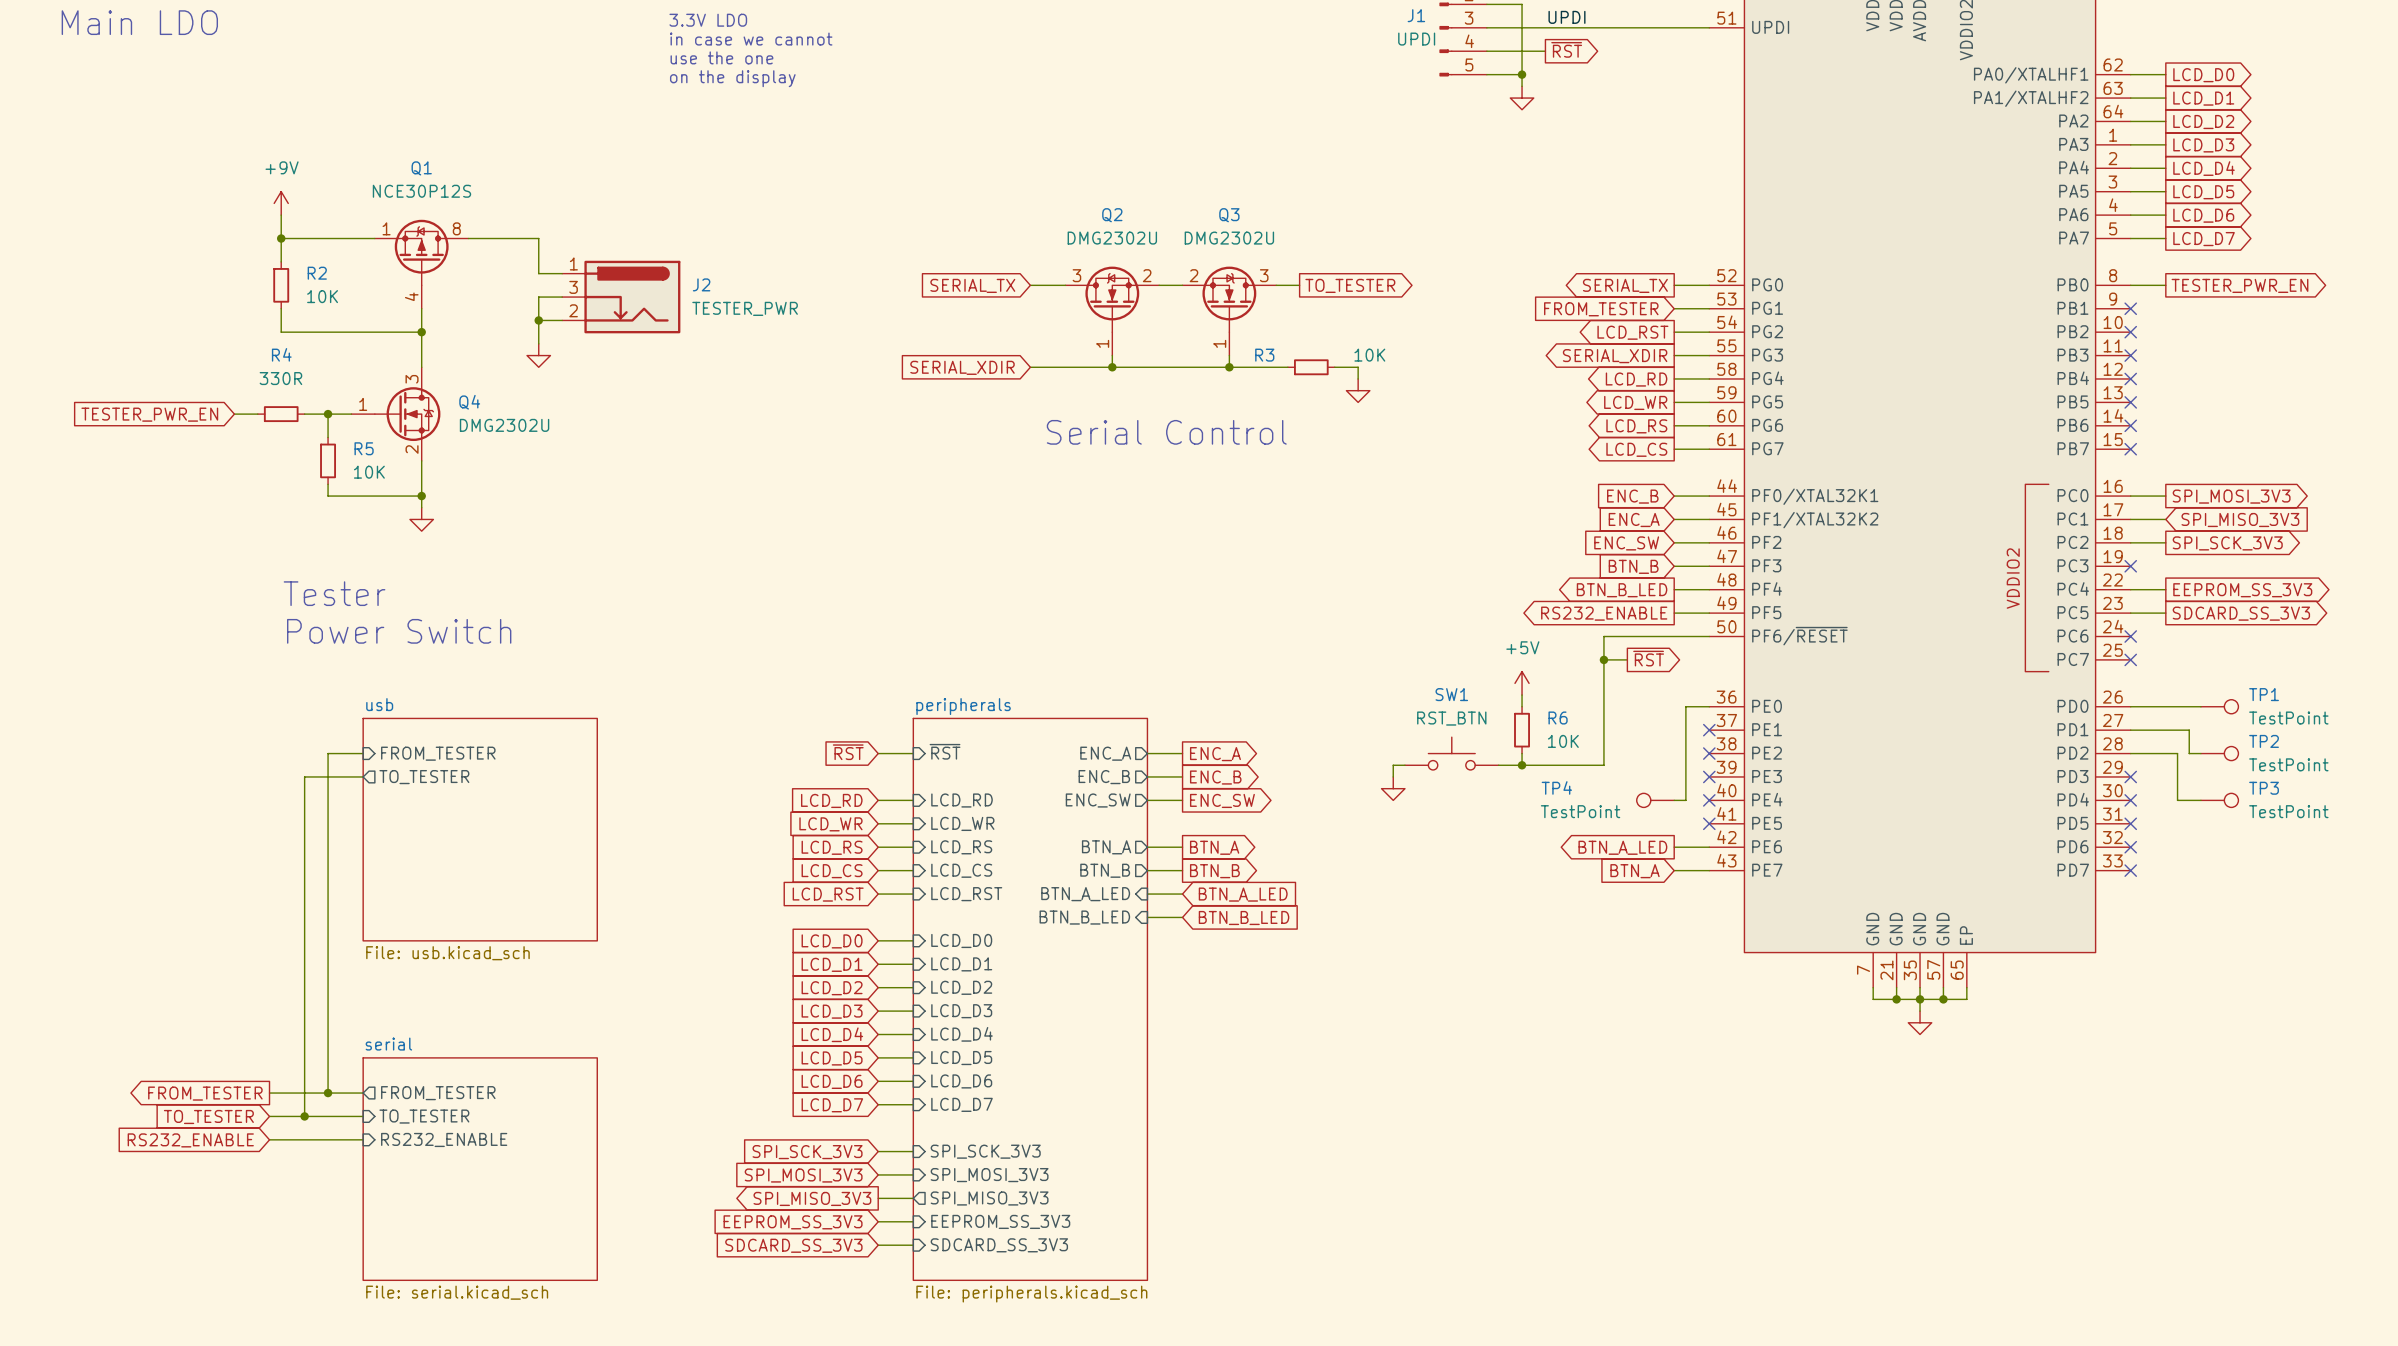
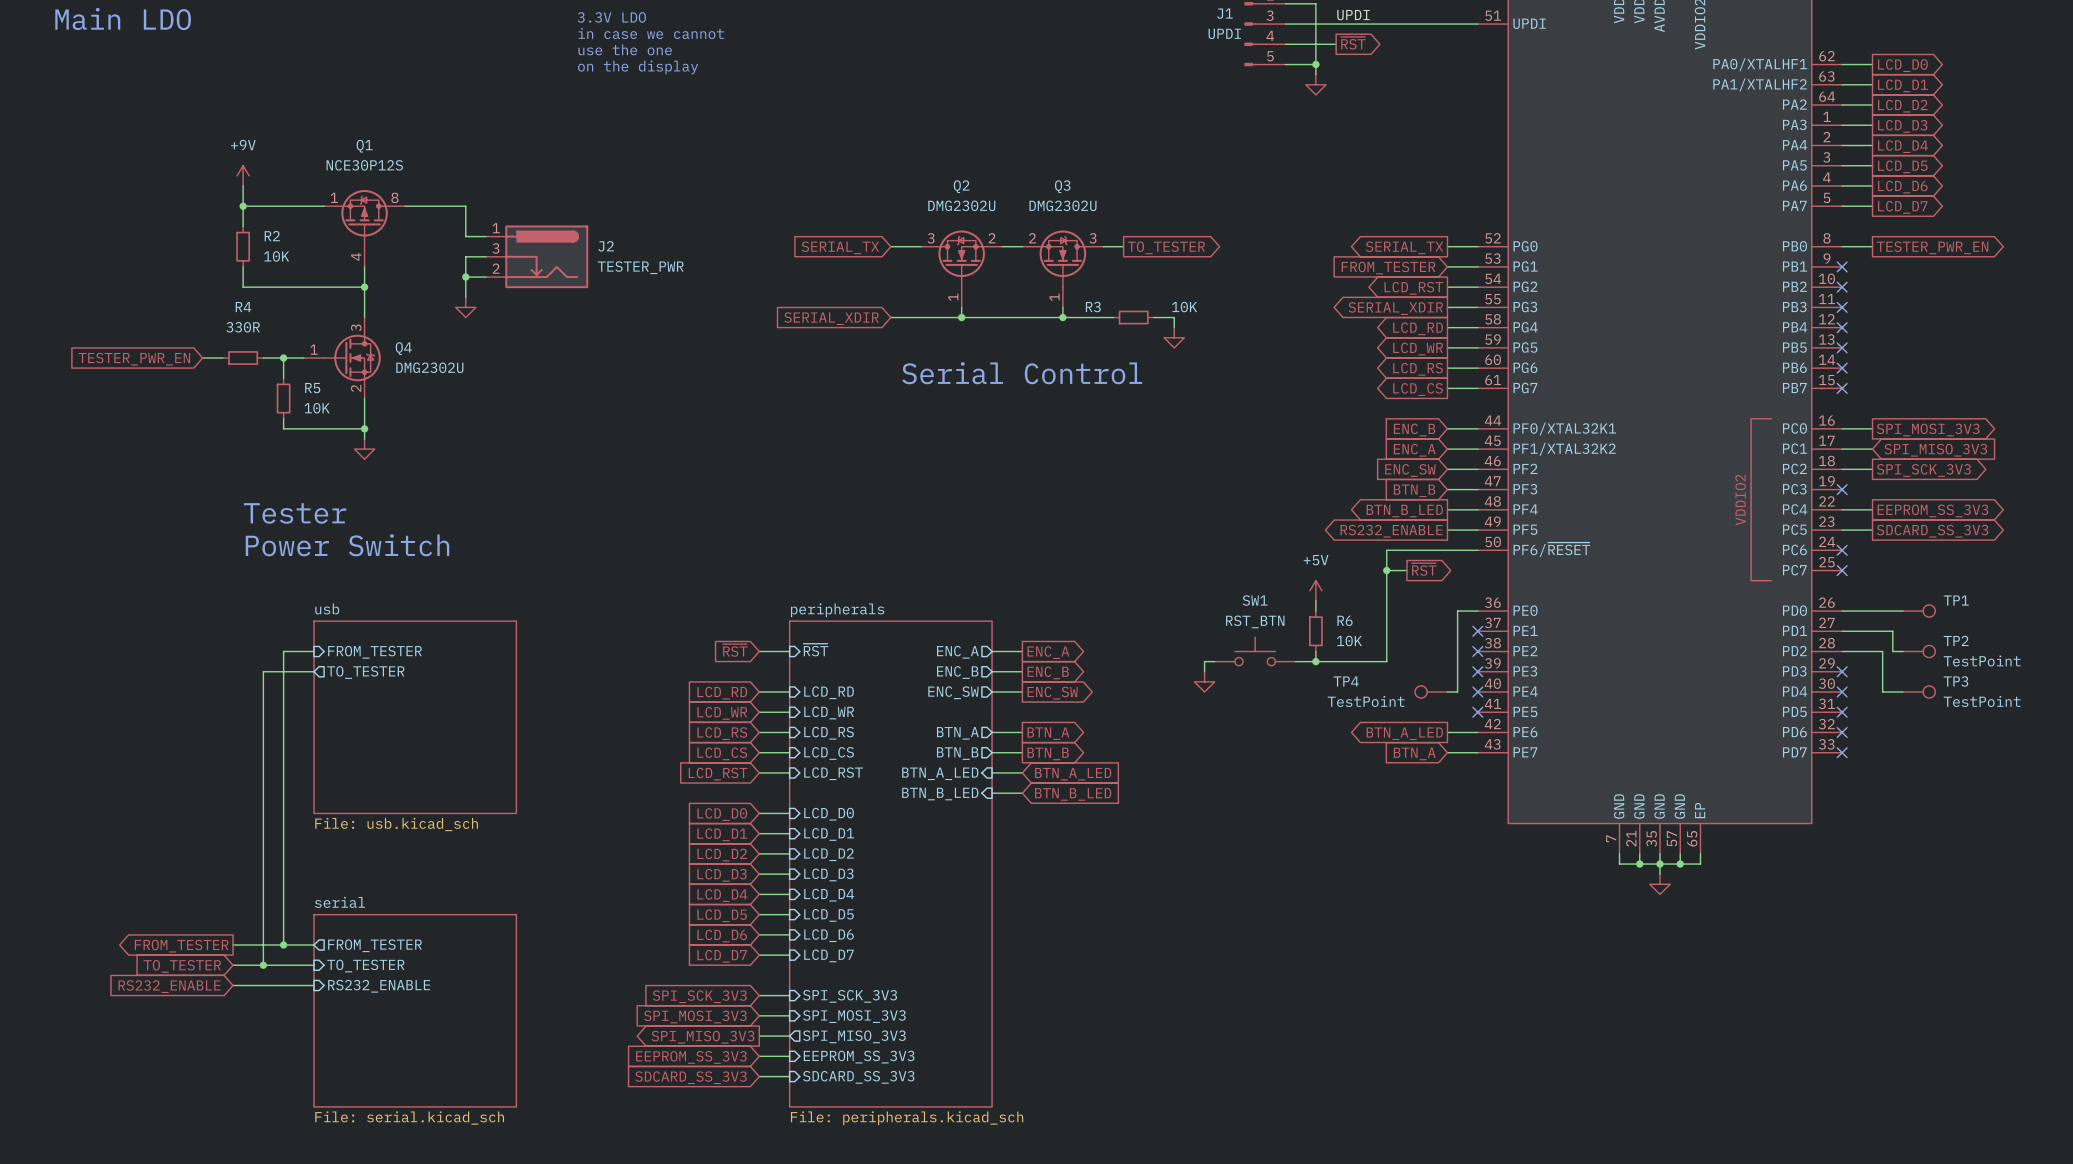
TP1 value: TestPoint (2288, 718) -> none

